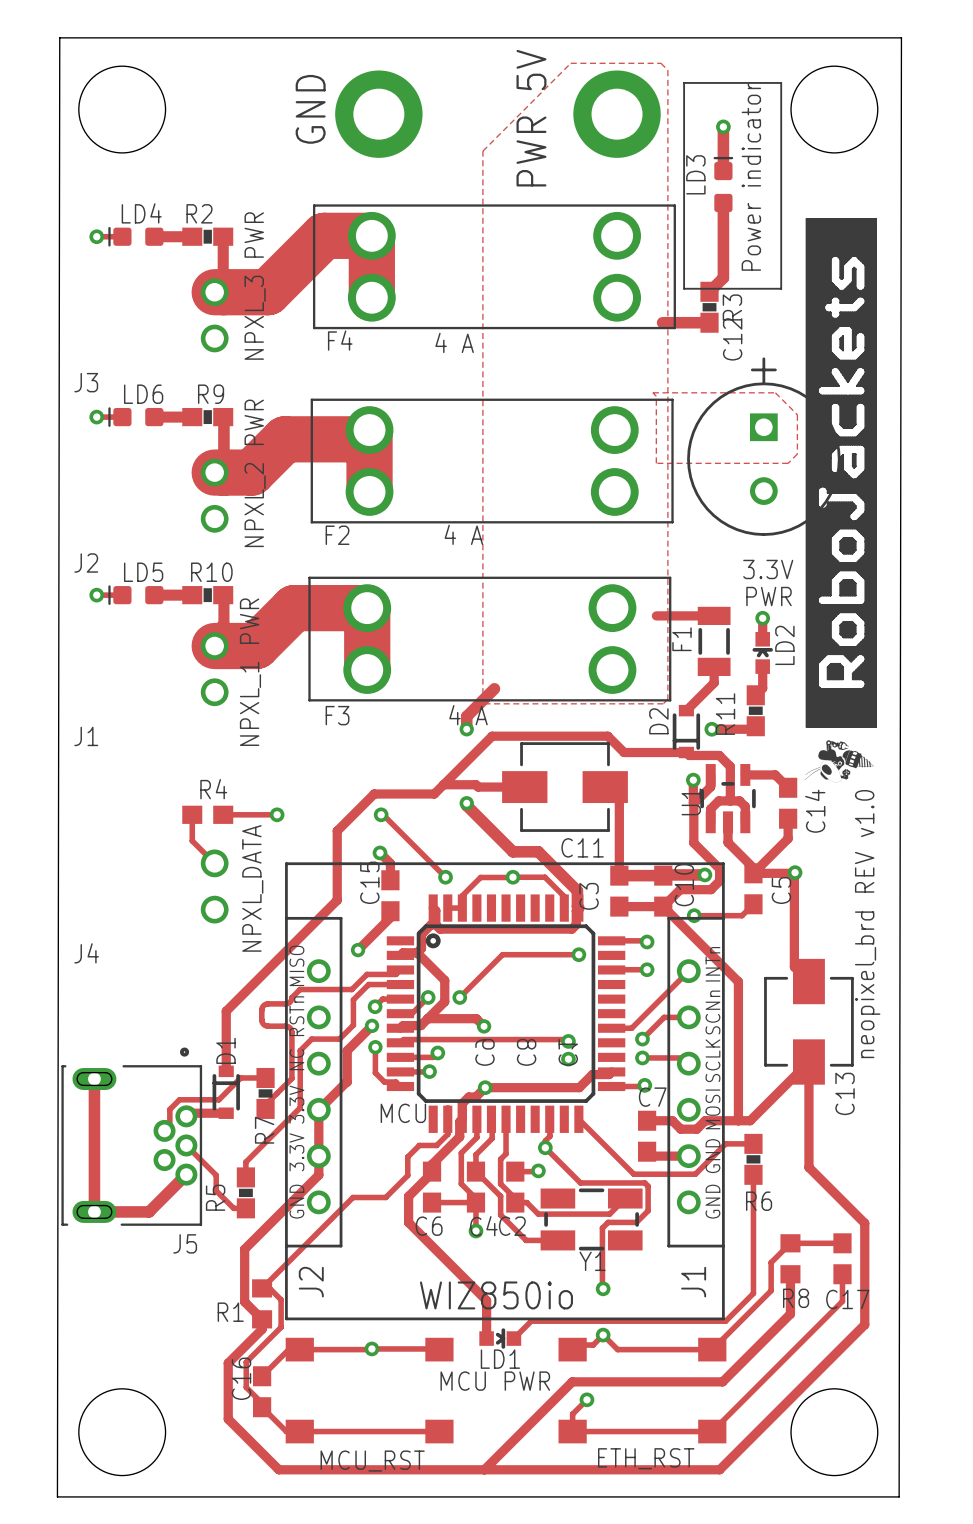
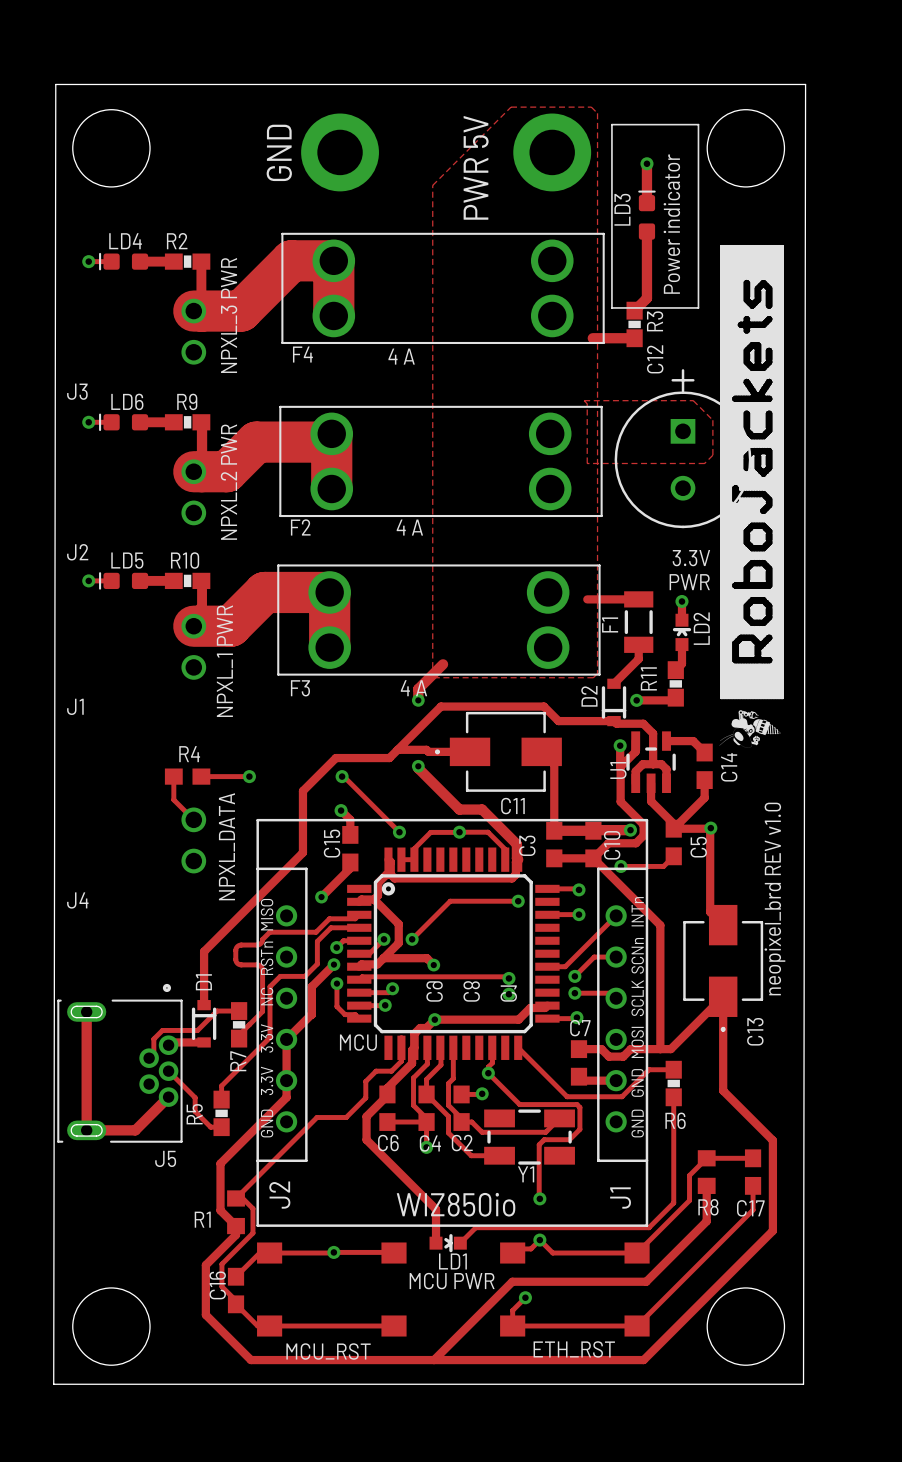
C11 footprint: [502, 742, 628, 832] -> [435, 711, 562, 792]
C13 footprint: [764, 958, 854, 1085] -> [683, 904, 764, 1032]

